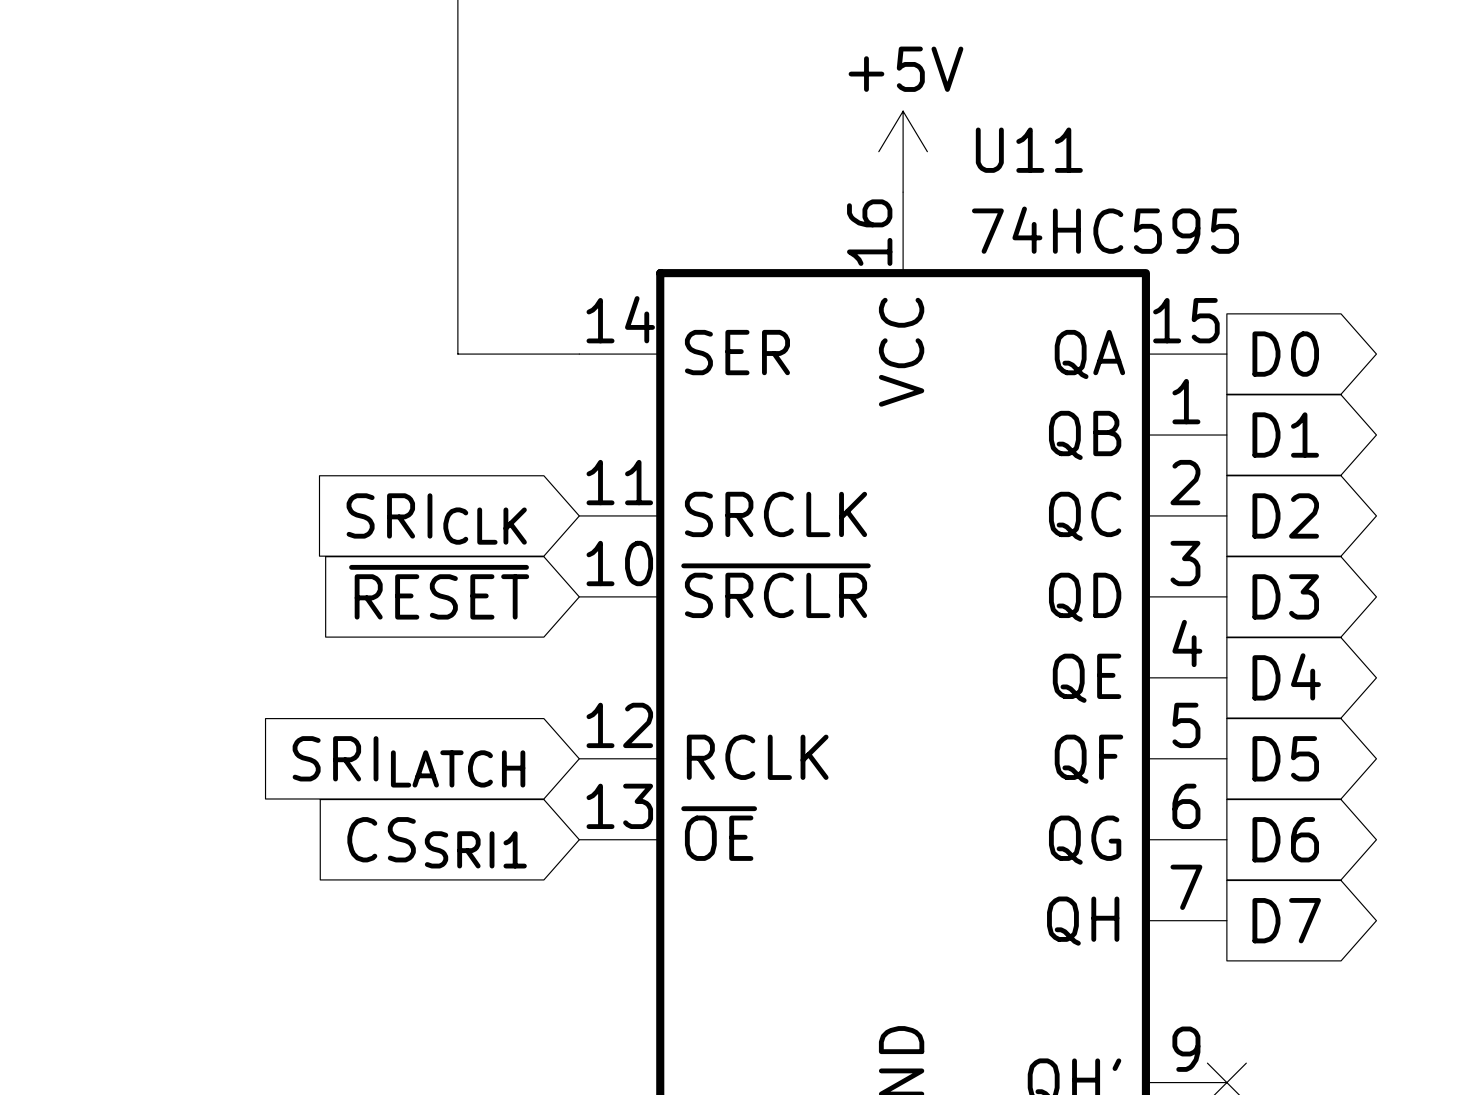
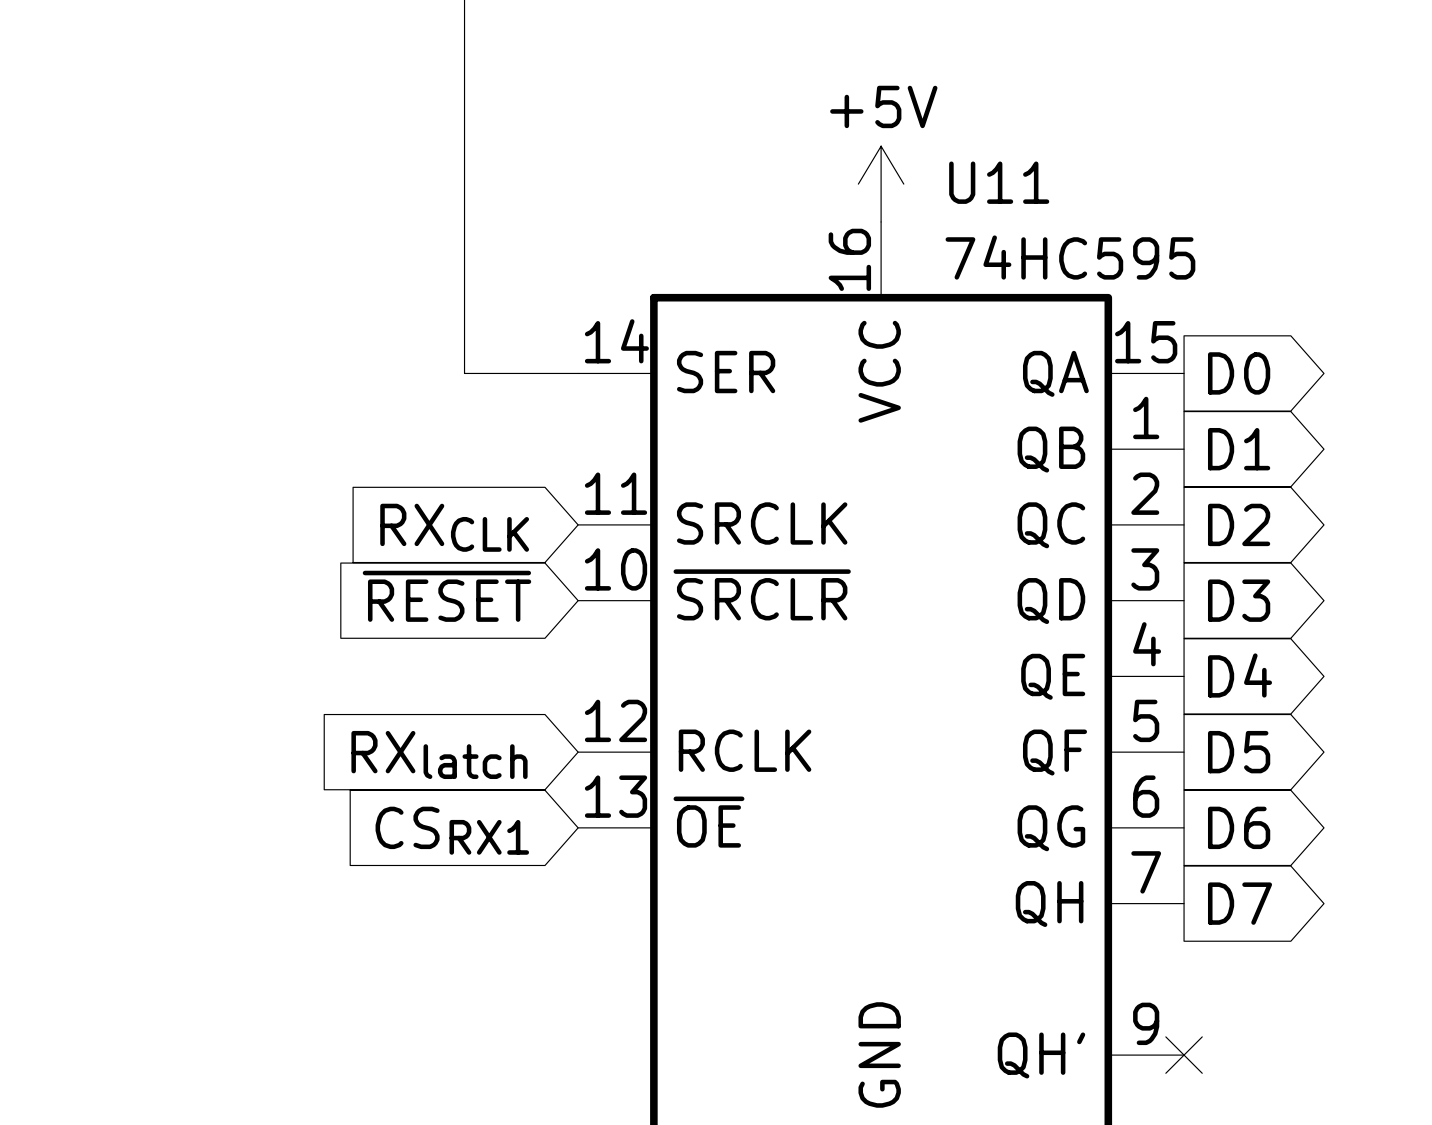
global label: SRICLK (436, 518) -> RXCLK (454, 527)
global label: SRILATCH (408, 761) -> RXlatch (439, 754)
global label: CSSRI1 (437, 842) -> CSRX1 (452, 830)

